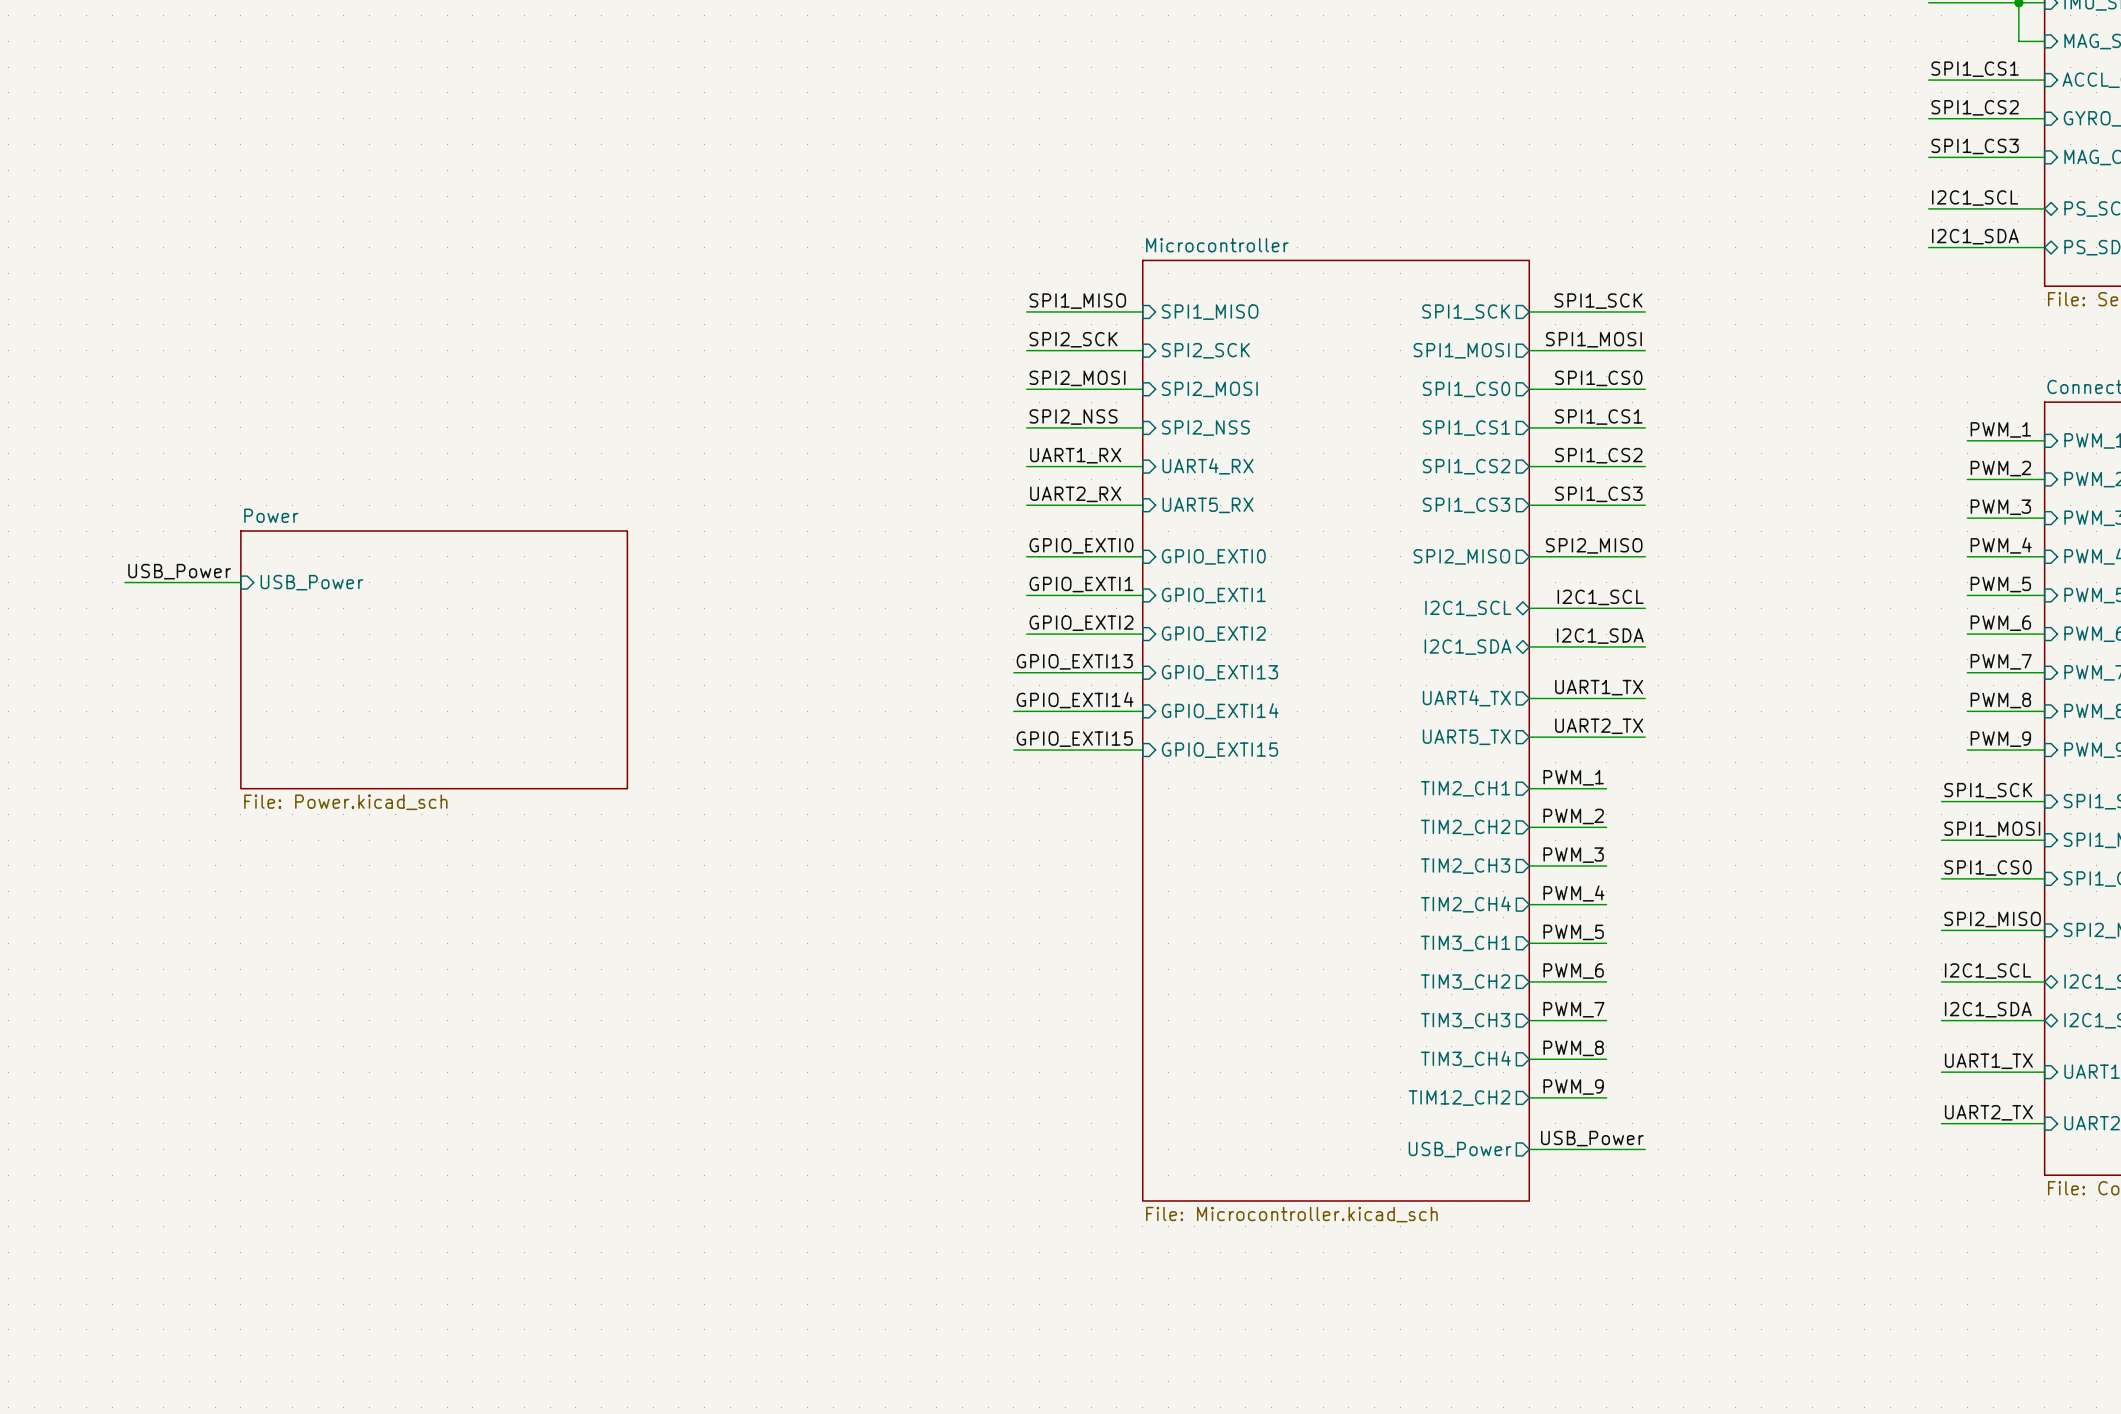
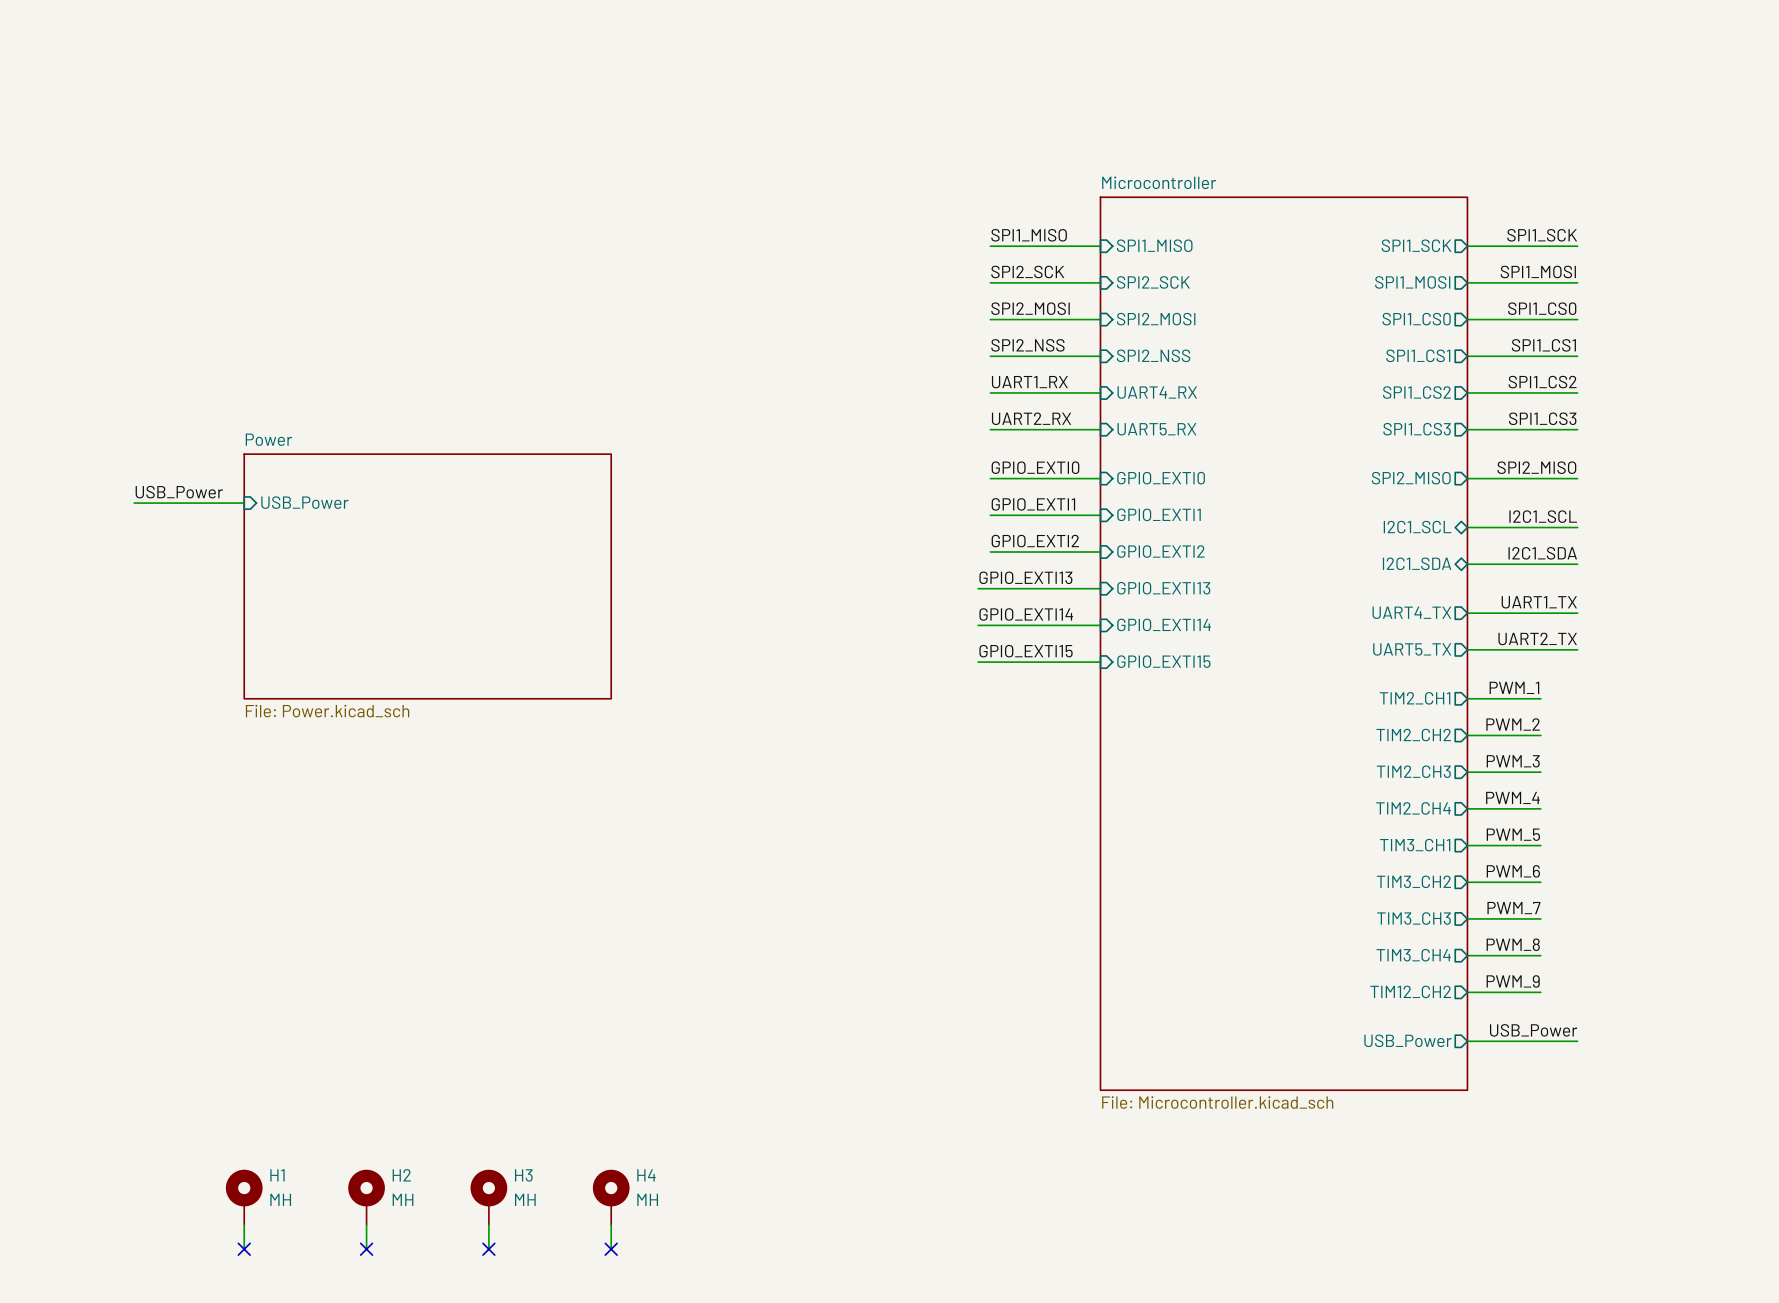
H1: none -> MH (244, 1197)
H2: none -> MH (366, 1197)
H3: none -> MH (488, 1197)
H4: none -> MH (611, 1197)
wire: none -> (244, 1224) (244, 1249)
wire: none -> (366, 1224) (366, 1249)
wire: none -> (488, 1224) (488, 1249)
wire: none -> (611, 1224) (611, 1249)
no-connect mark: none -> (244, 1249)
no-connect mark: none -> (366, 1249)
no-connect mark: none -> (488, 1249)
no-connect mark: none -> (611, 1249)

